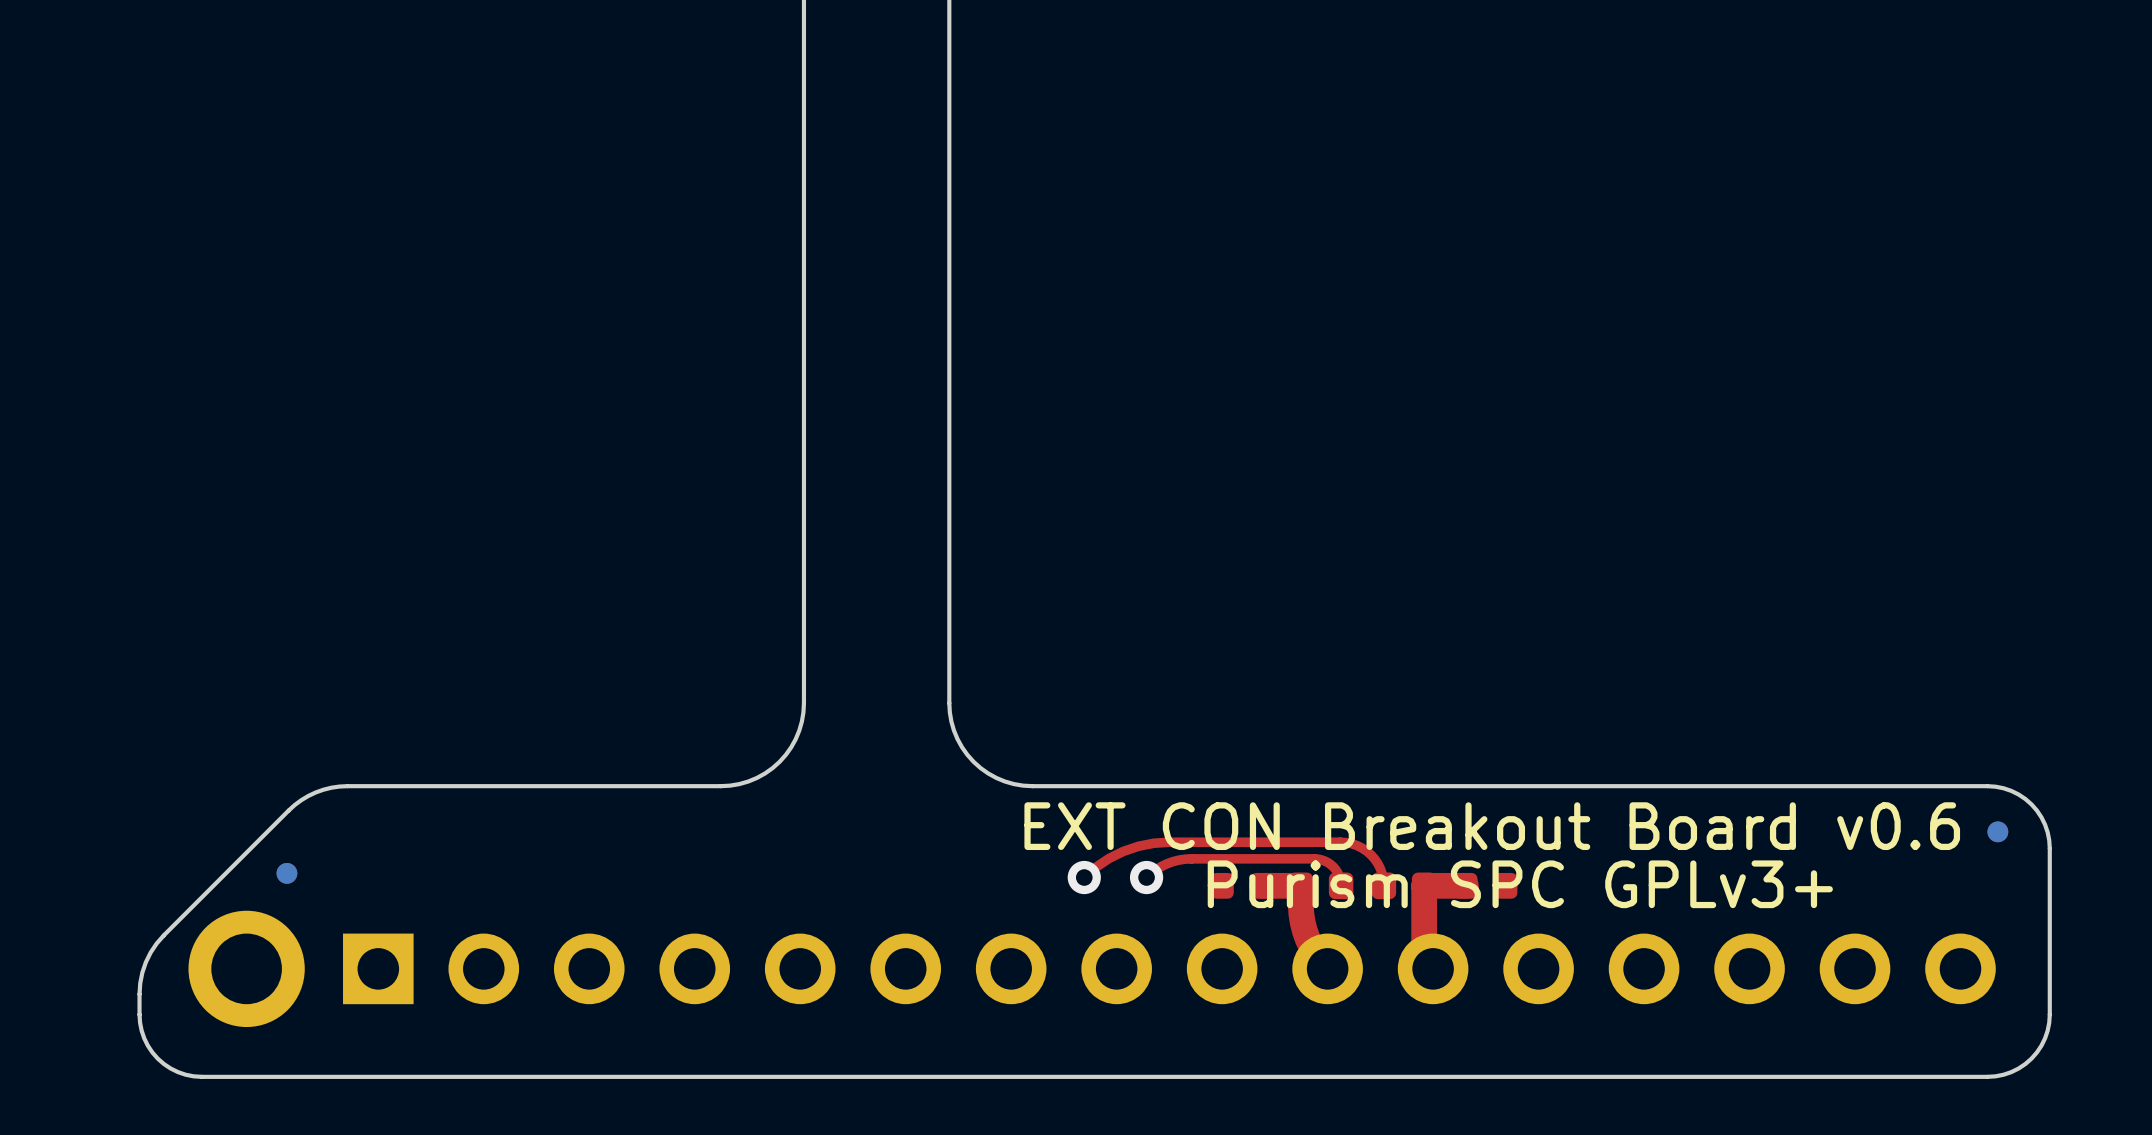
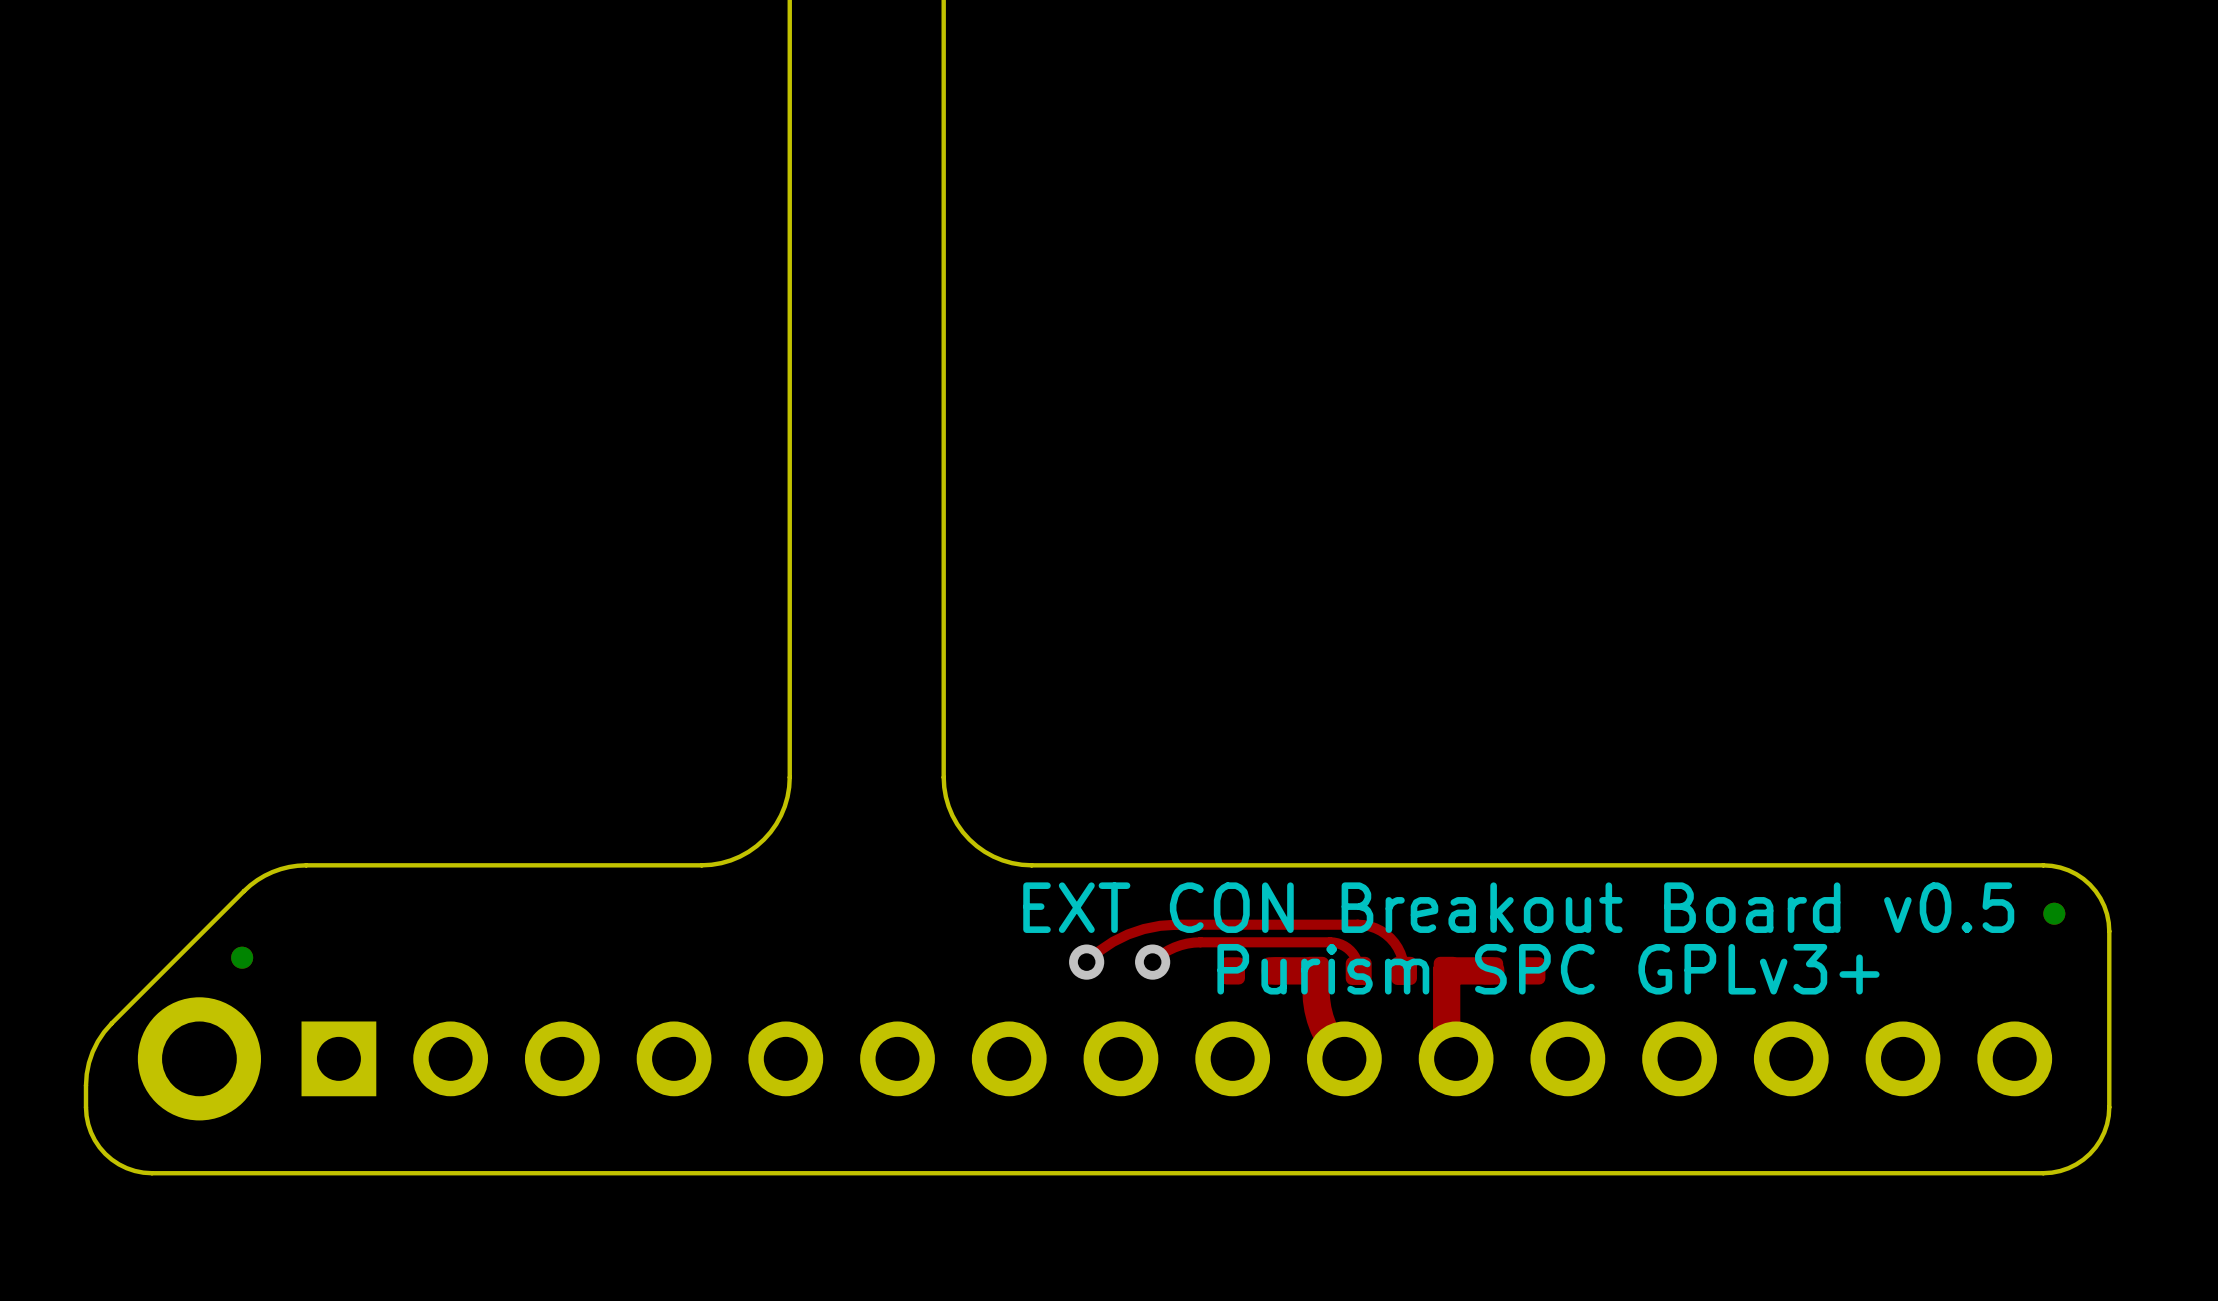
text: EXT CON Breakout Board v0.6 (1492, 826) -> EXT CON Breakout Board v0.5 (1518, 907)

